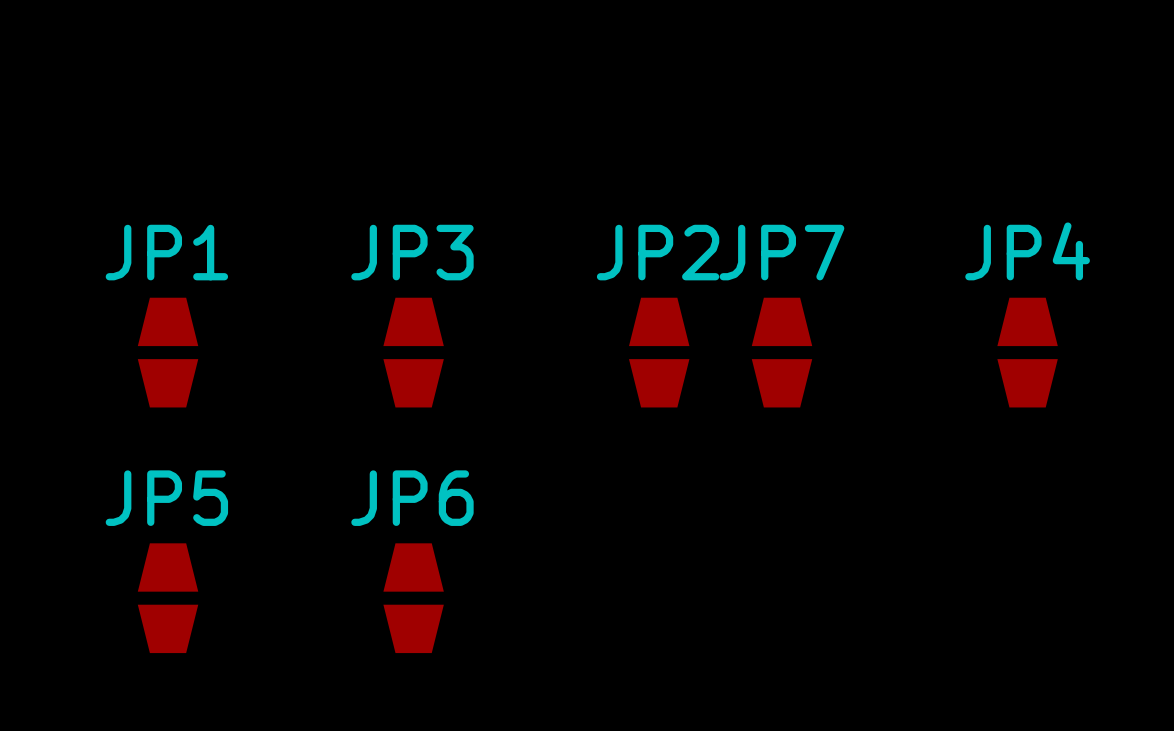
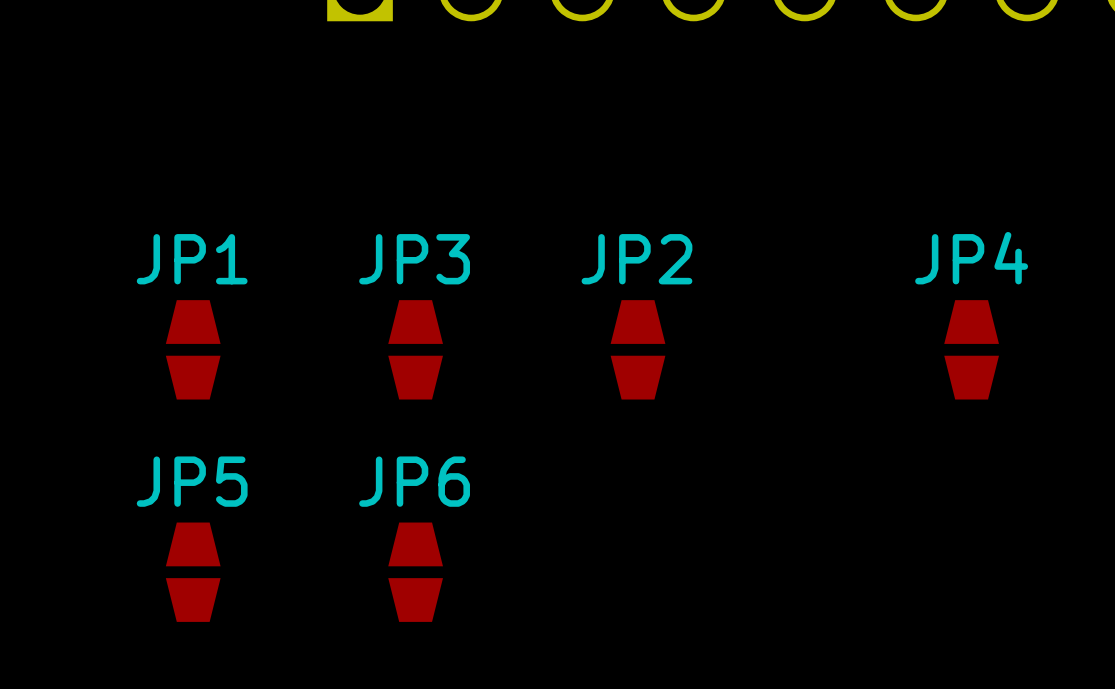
JP7: (782, 352) -> none

